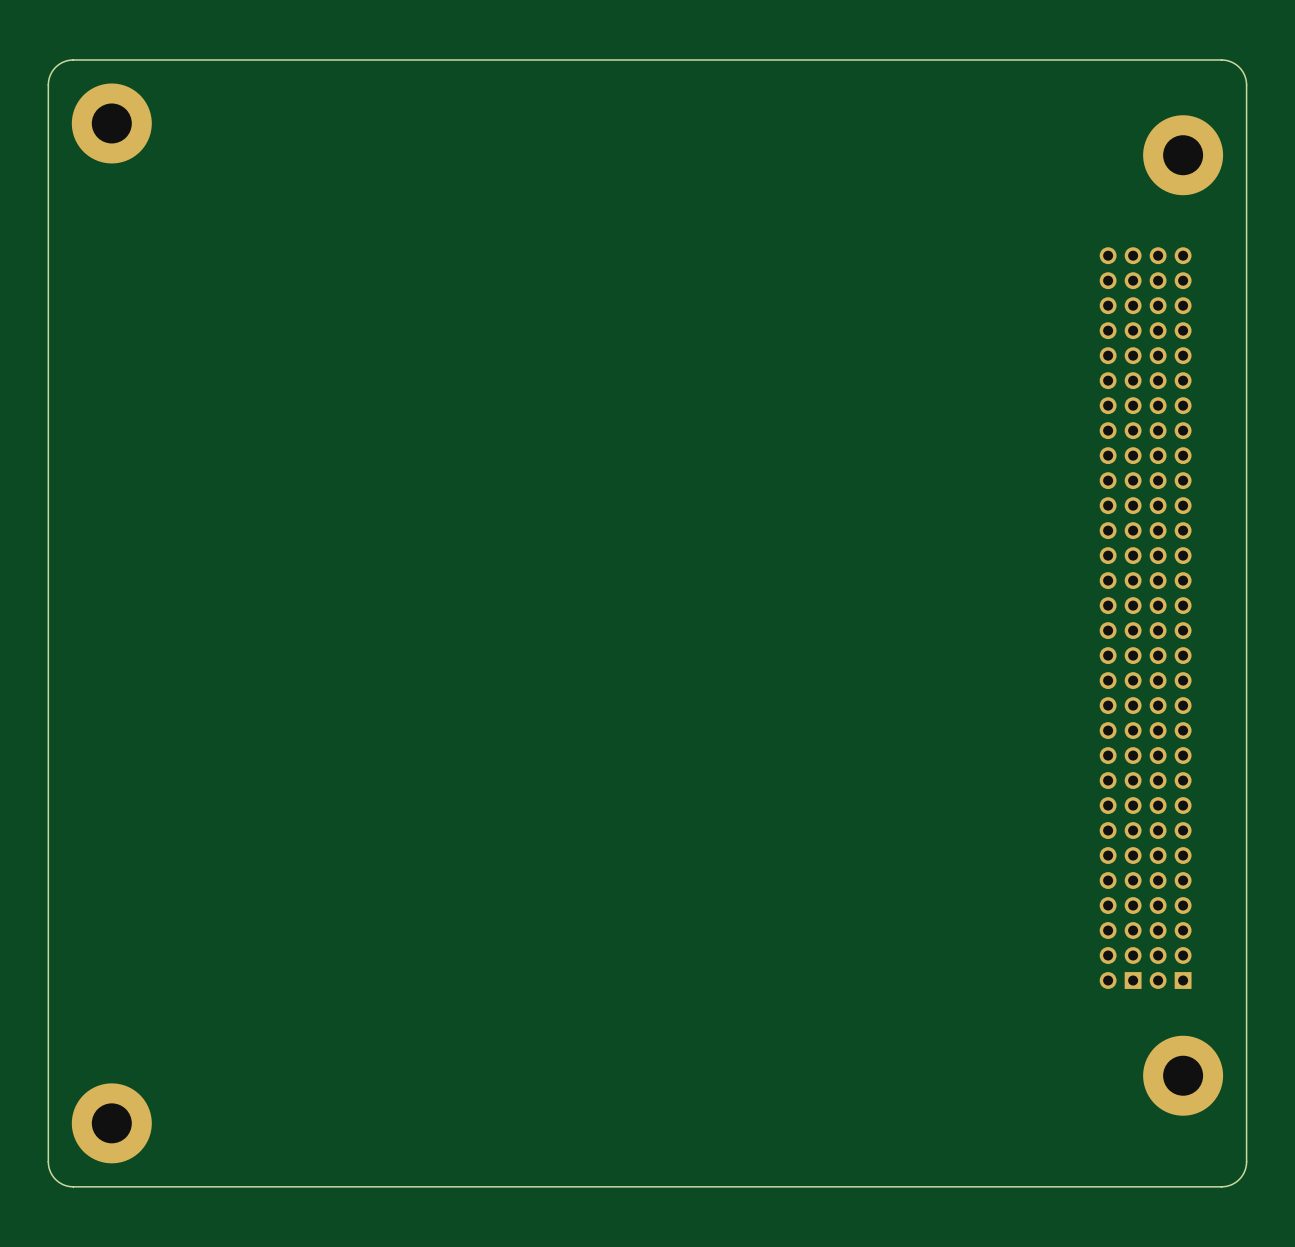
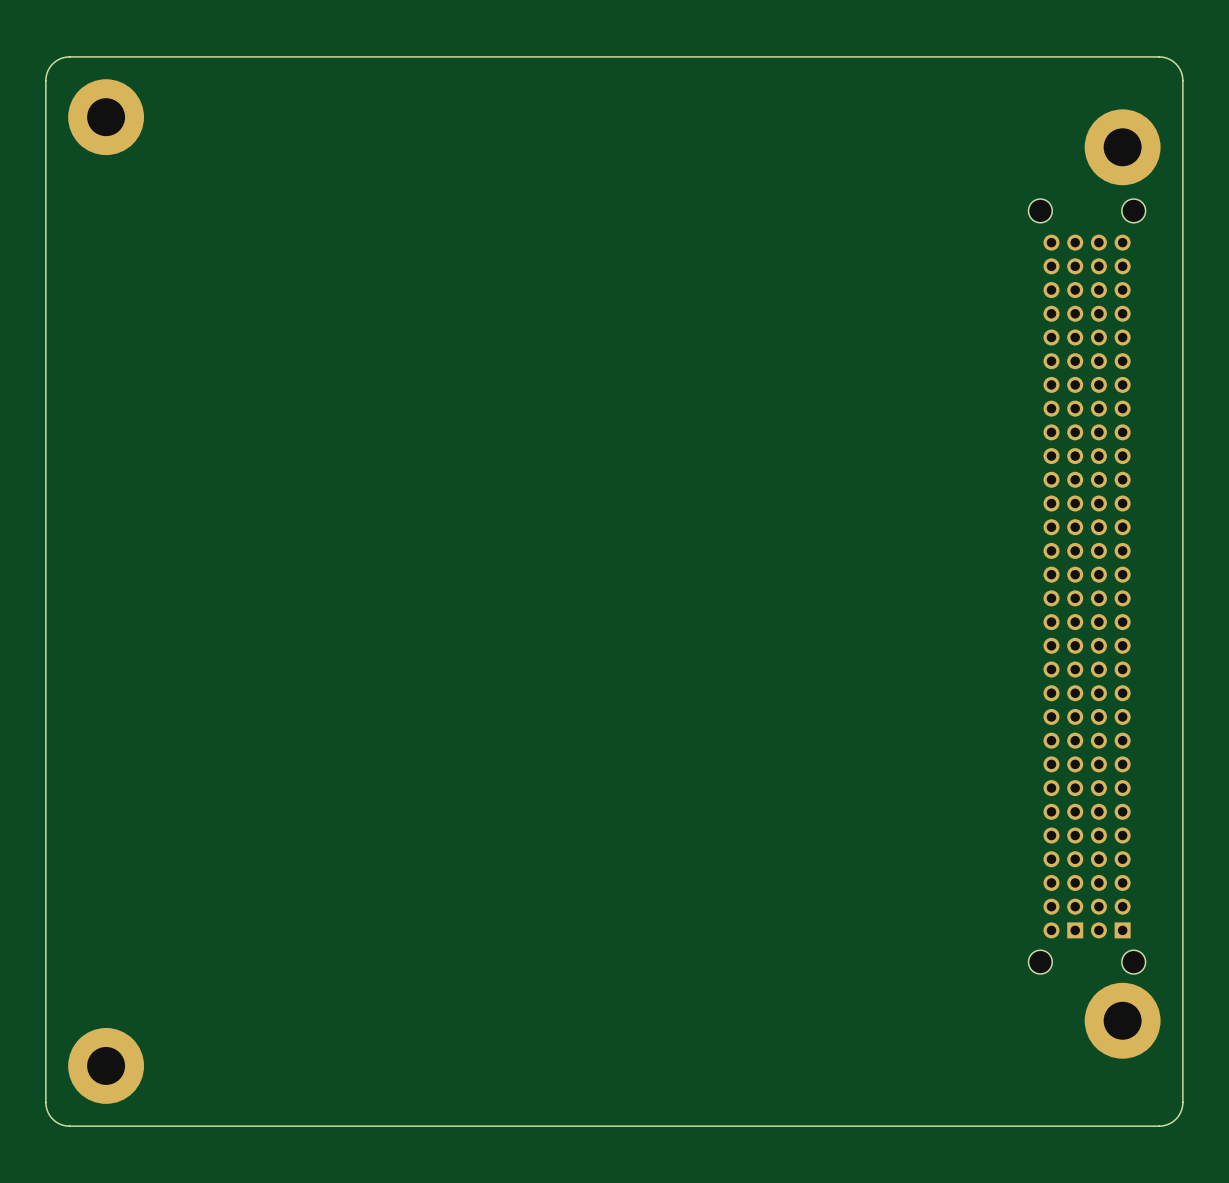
part: none -> (1040, 210)
part: none -> (1133, 210)
part: none -> (1040, 962)
part: none -> (1133, 962)

